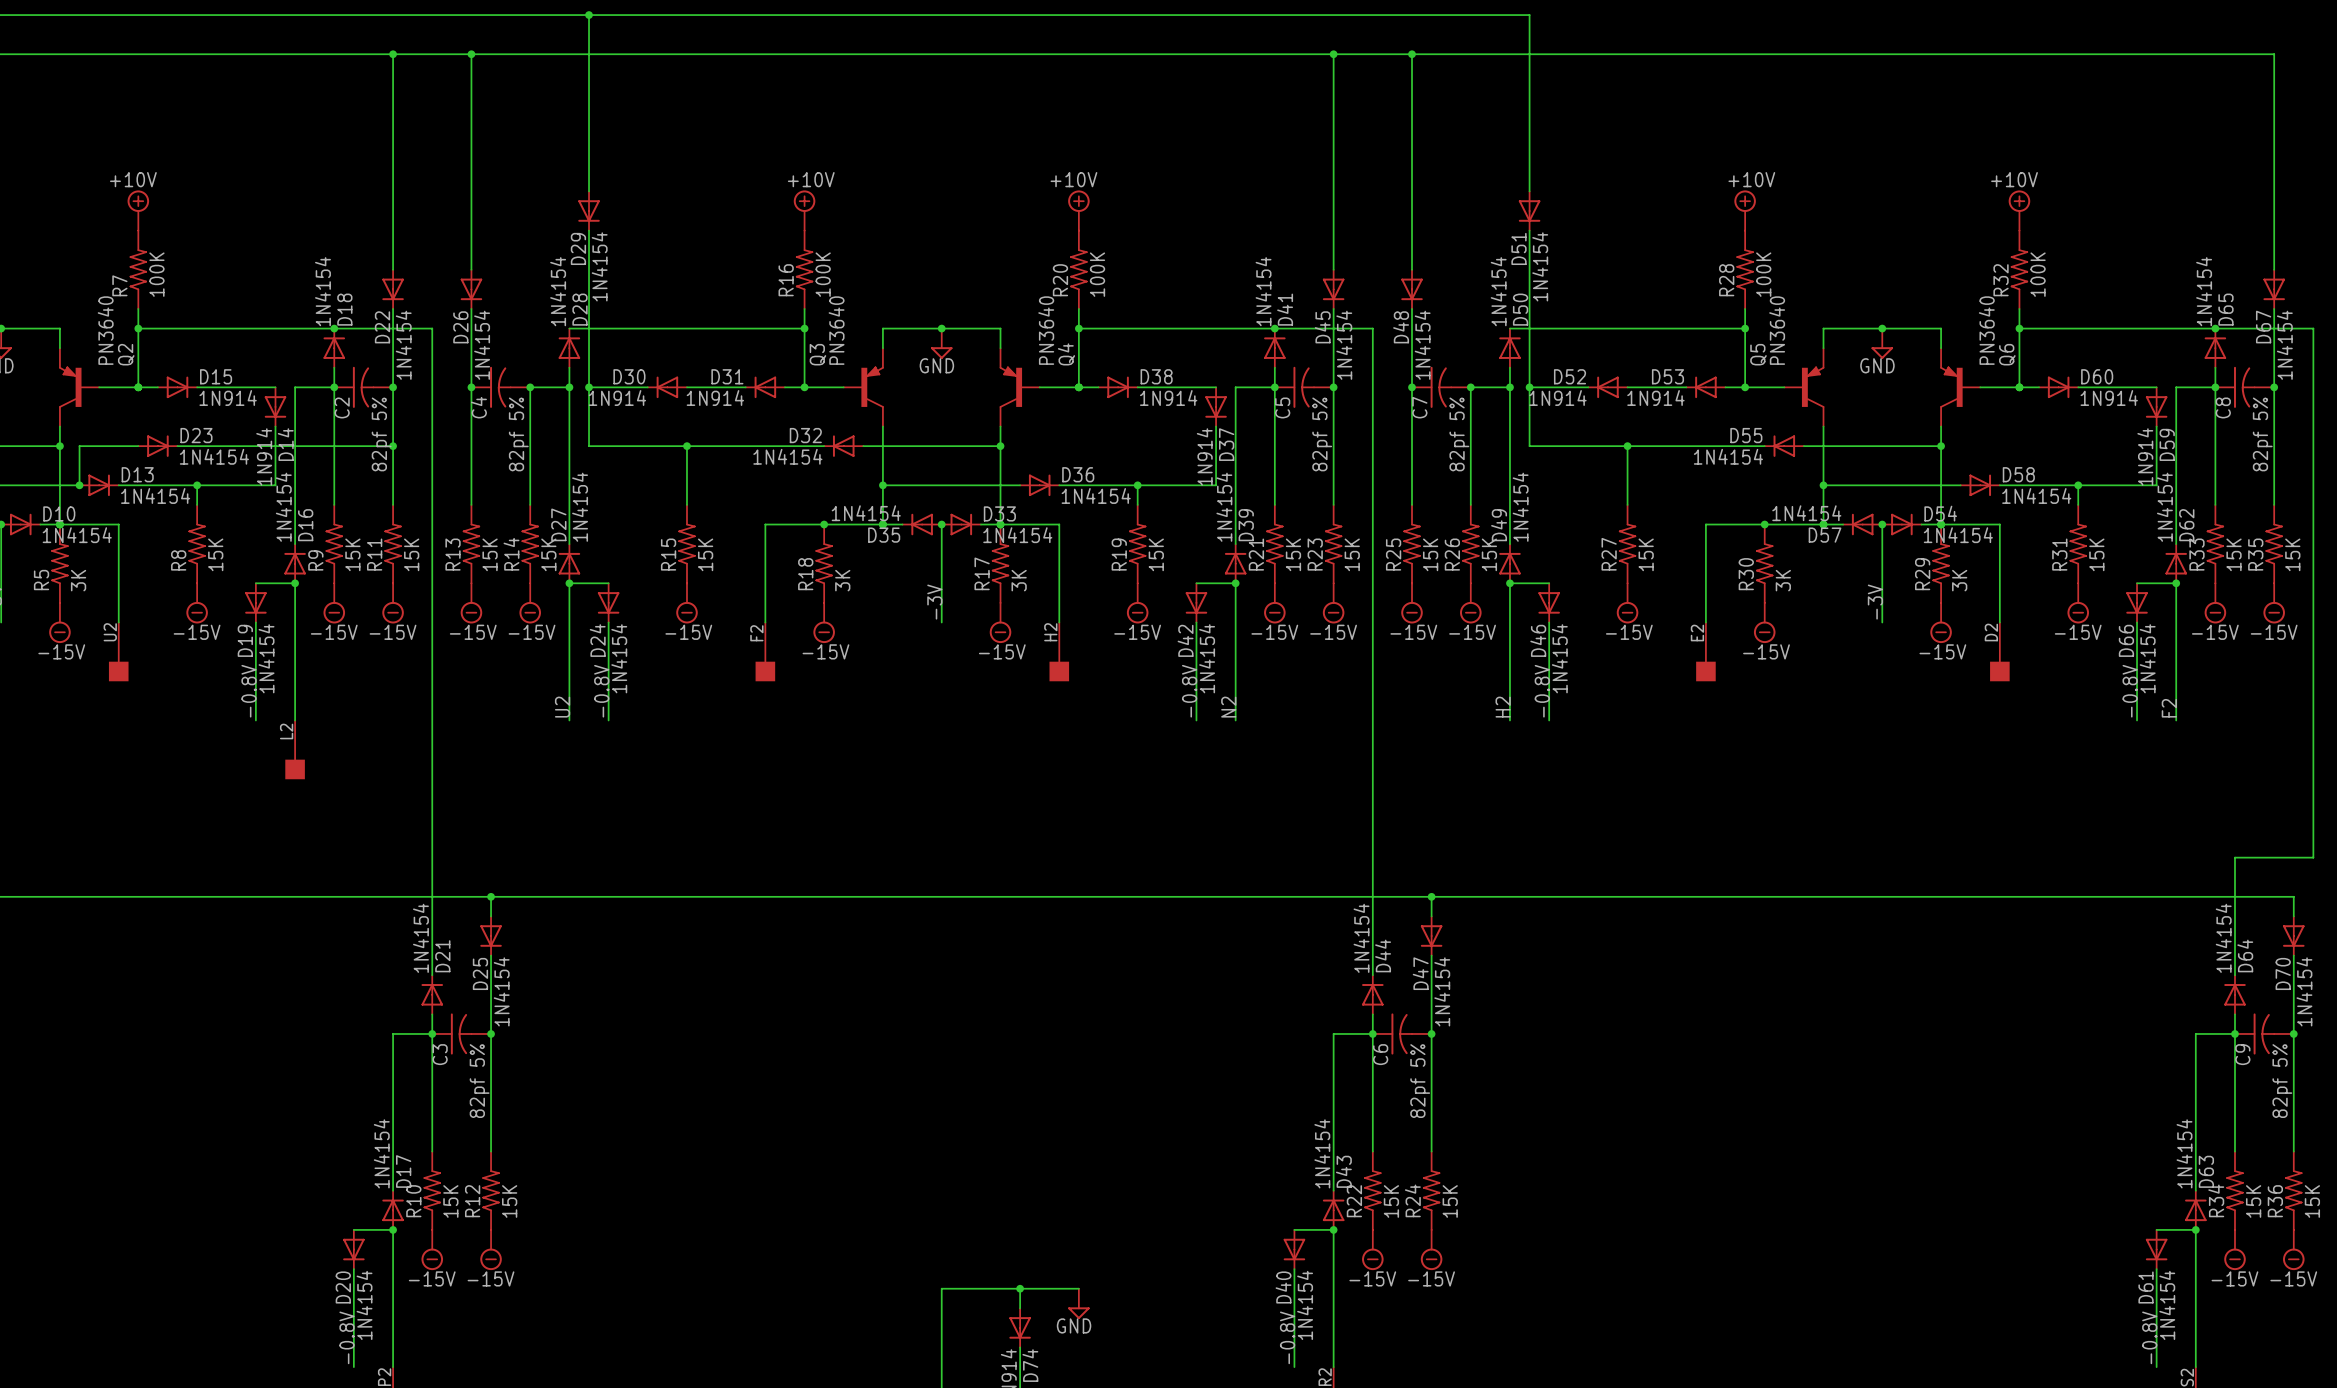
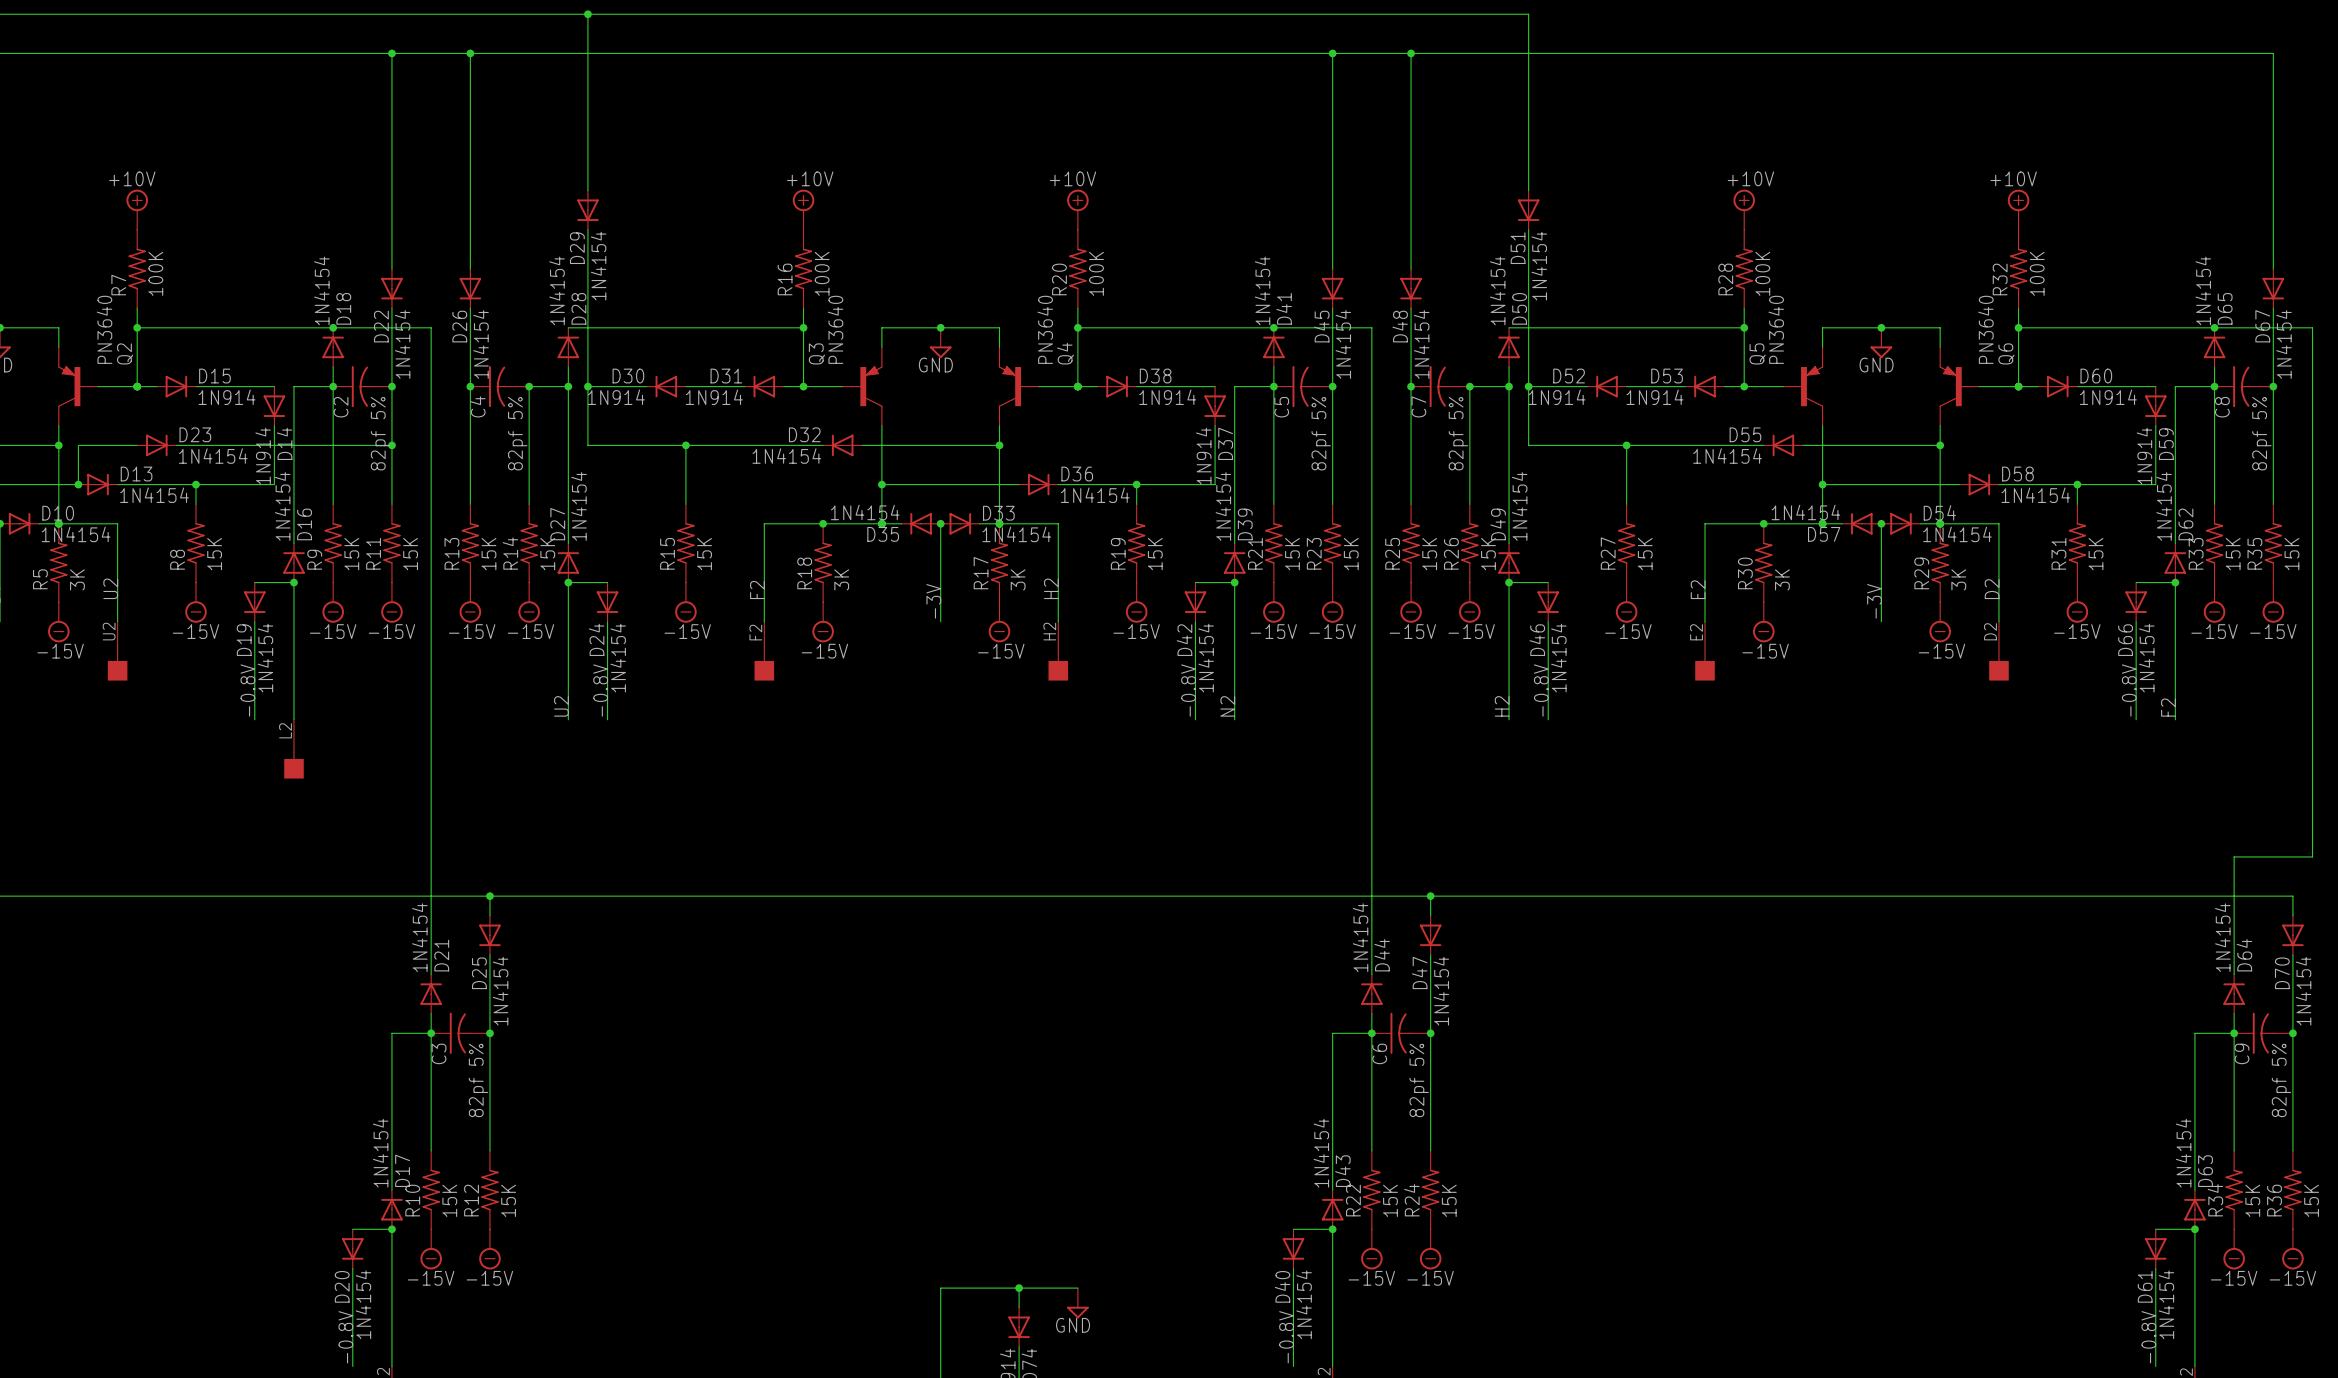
label: none -> U2 (110, 588)
label: none -> H2 (1051, 588)
label: none -> D2 (1992, 589)
label: none -> F2 (757, 589)
label: none -> E2 (1698, 589)

